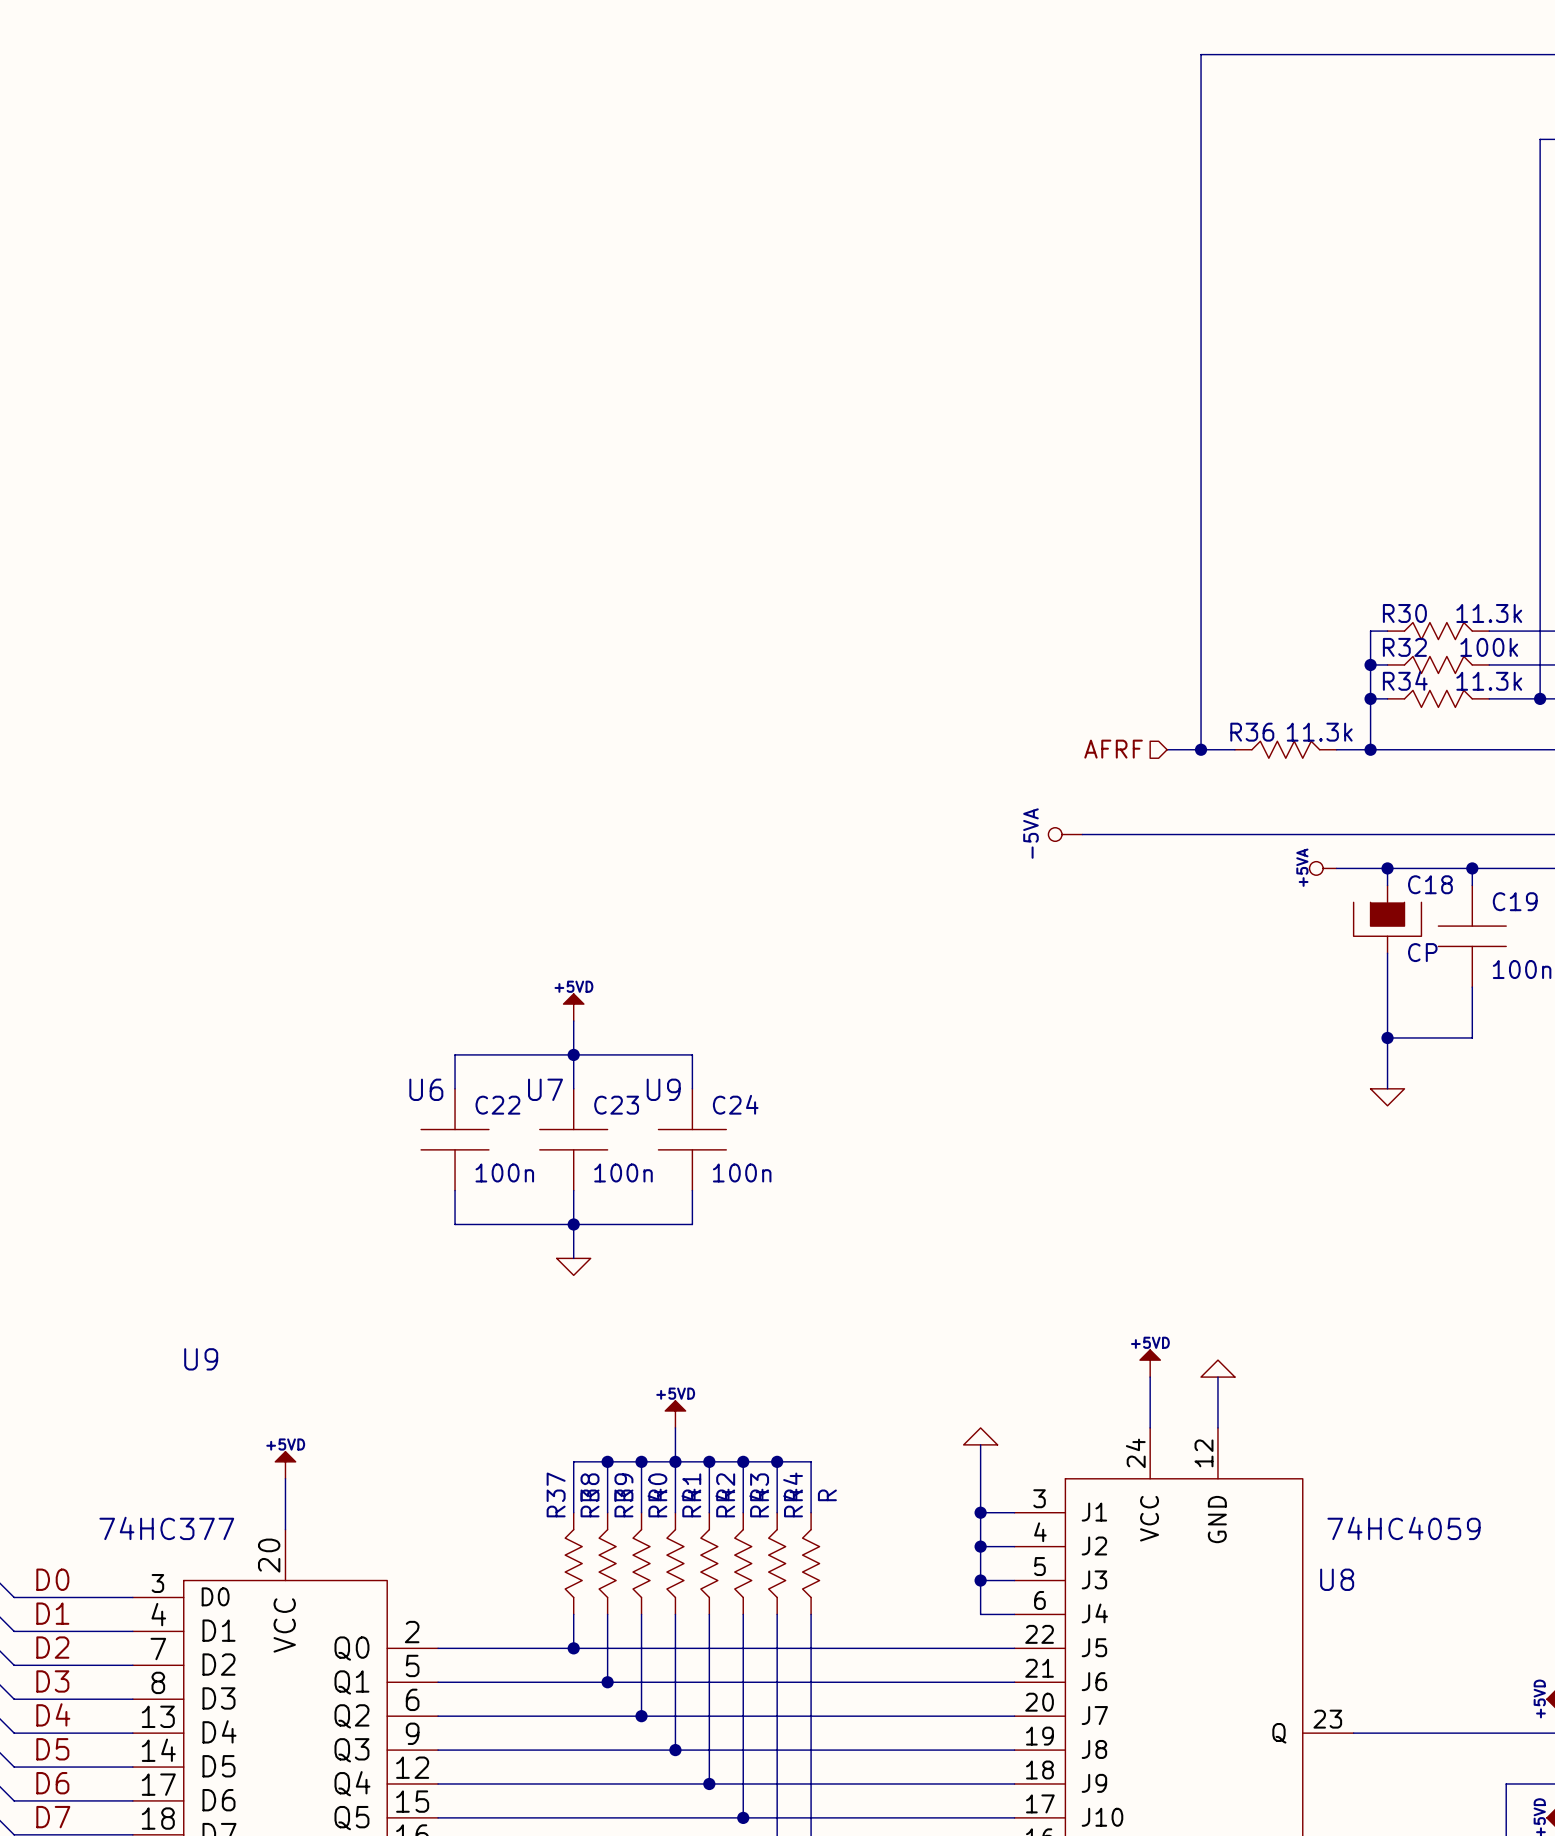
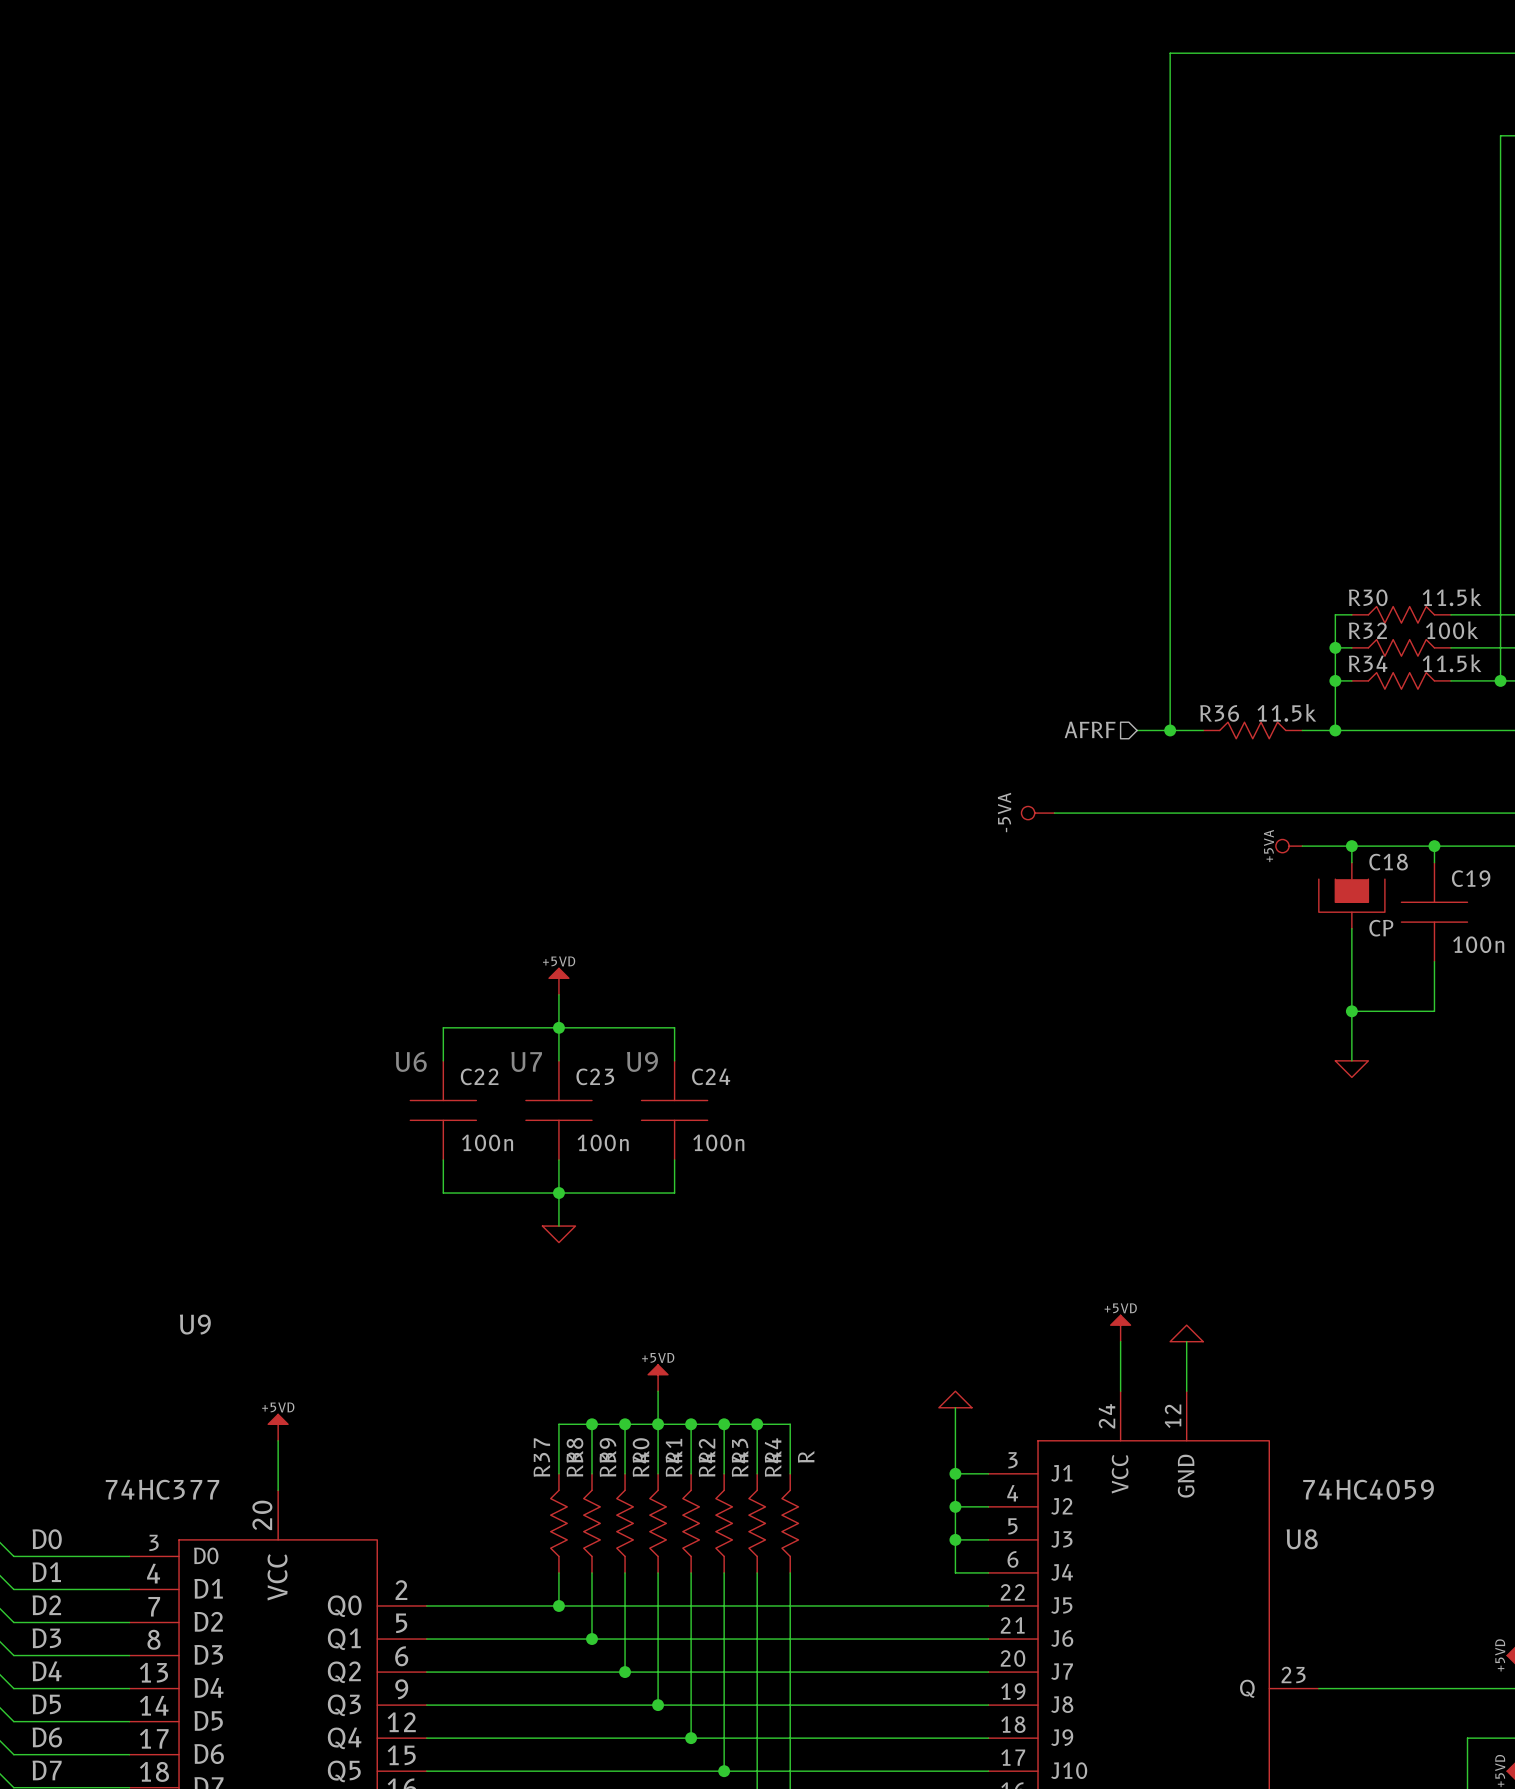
R30 value: 11.3k (1489, 613) -> 11.5k (1452, 597)
R34 value: 11.3k (1489, 681) -> 11.5k (1452, 663)
R36 value: 11.3k (1319, 732) -> 11.5k (1286, 712)

